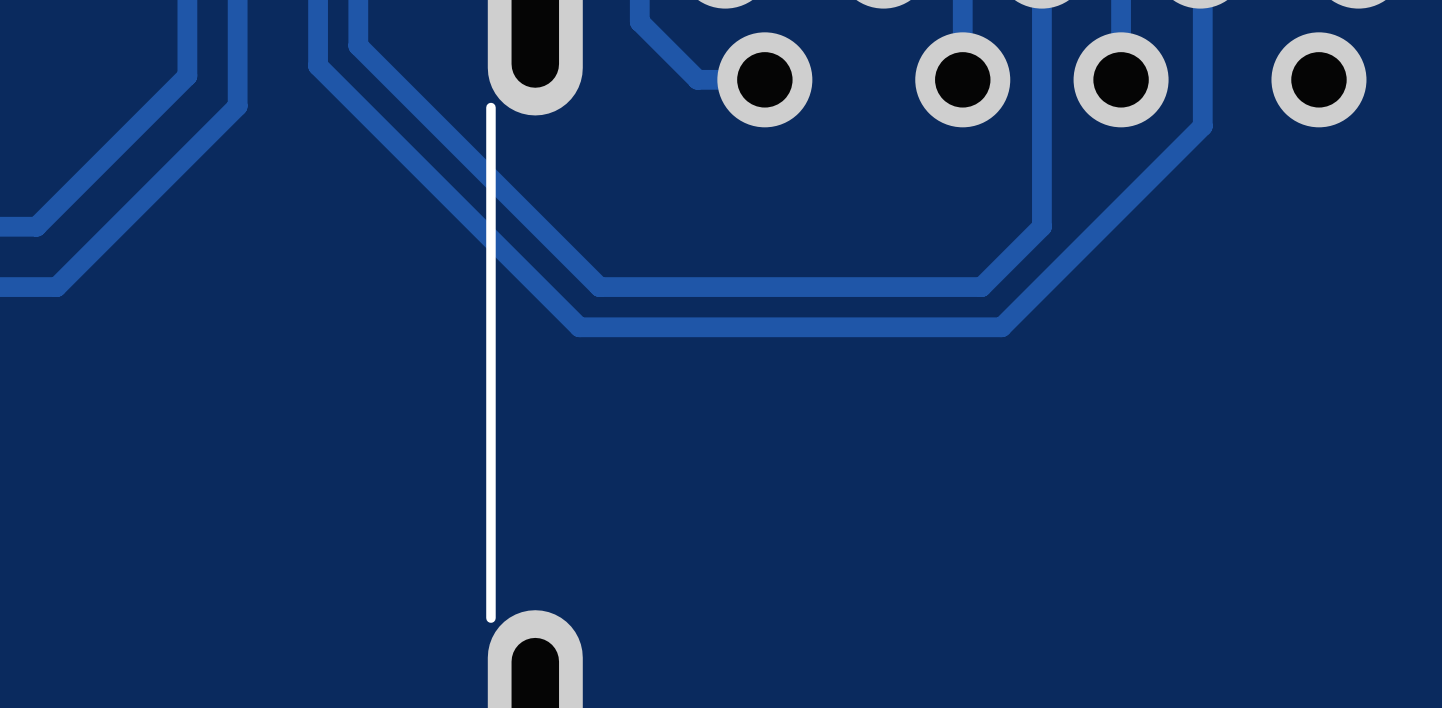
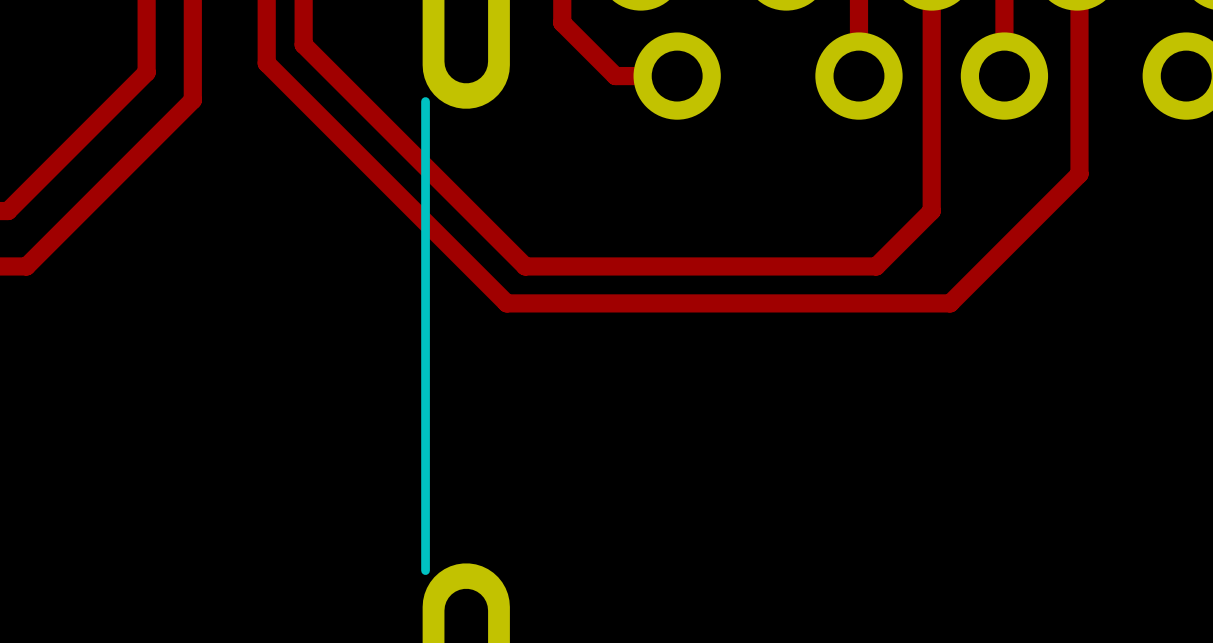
track: (1202, 126) (1001, 327) -> (1079, 118) (1079, 174) (950, 303) (894, 303)

